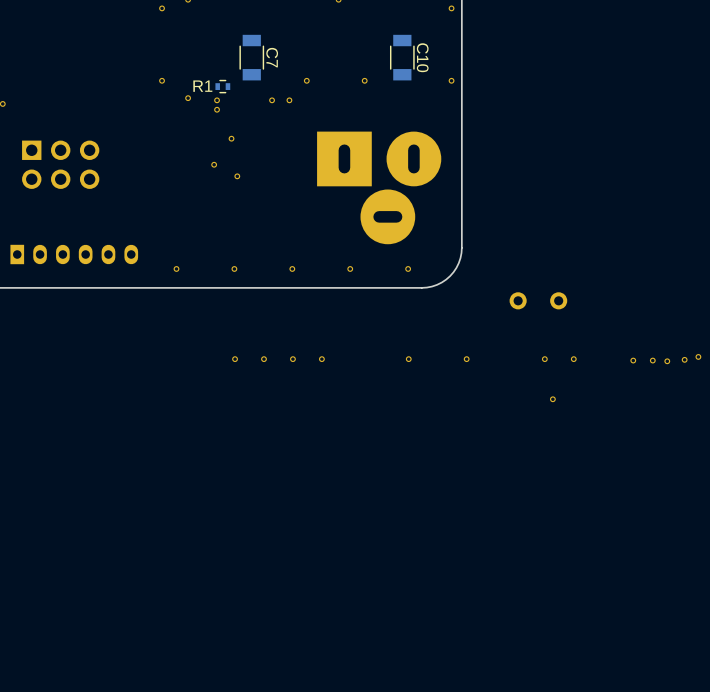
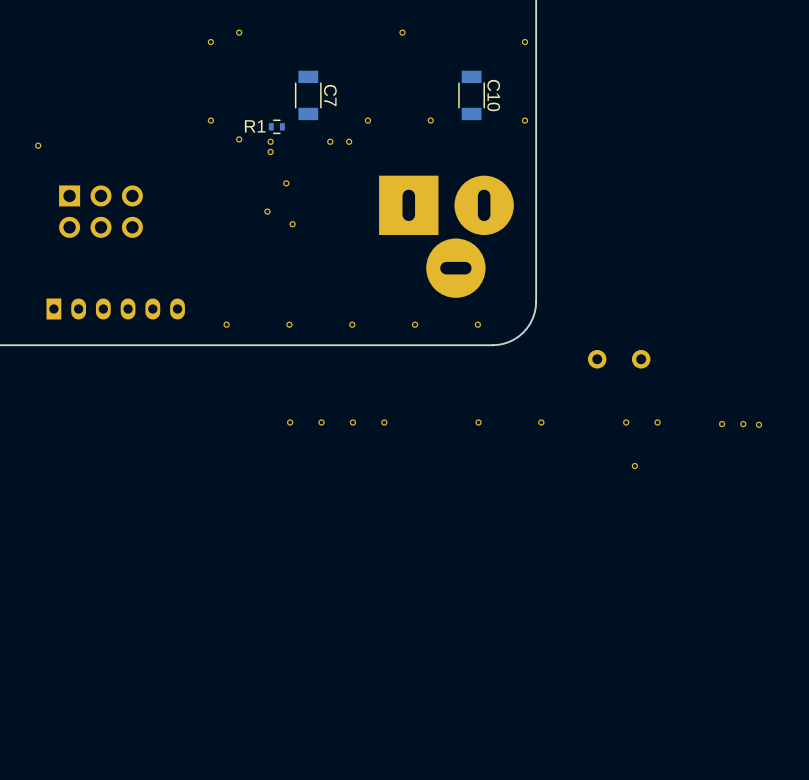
part: (698, 356) -> none
part: (684, 359) -> none

